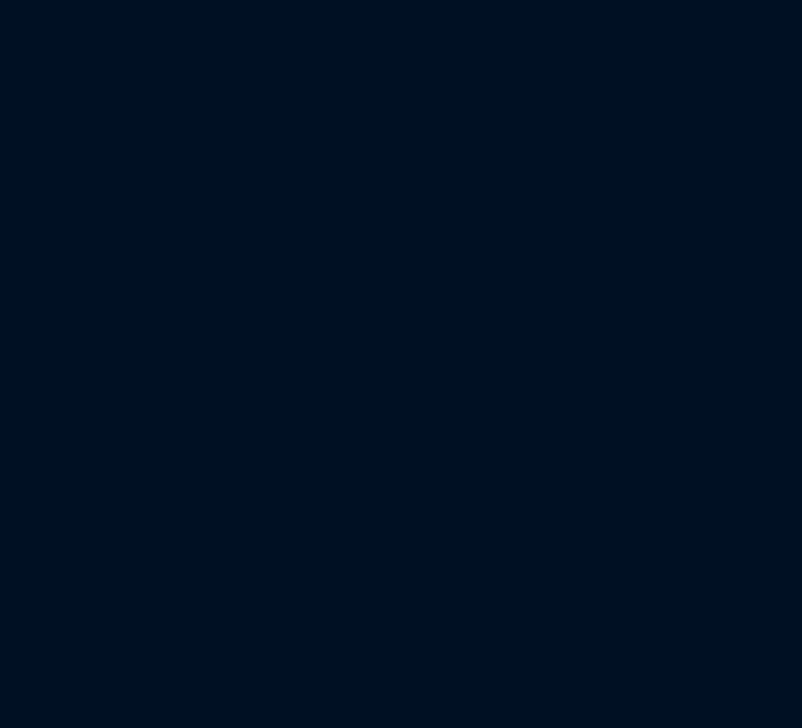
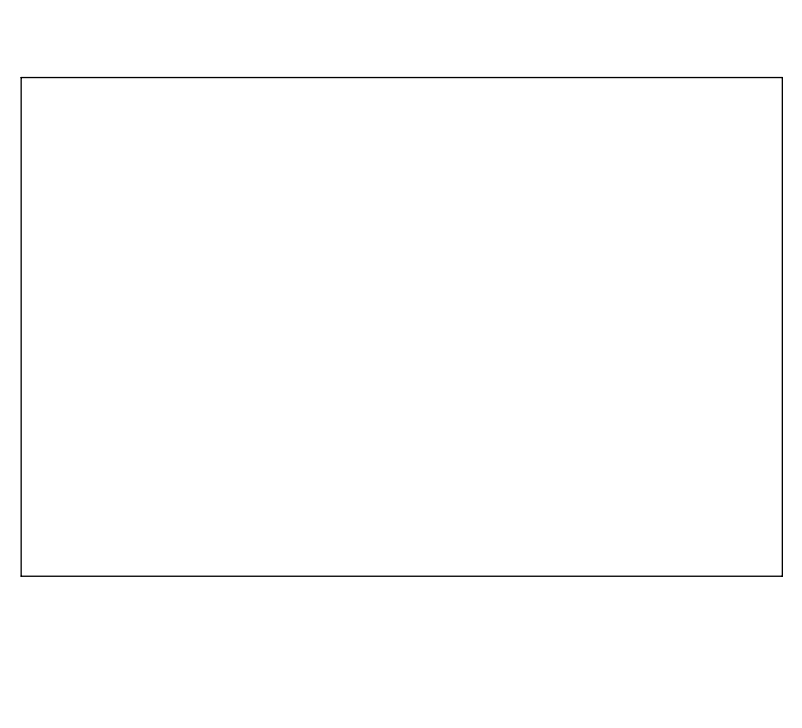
board edge: none -> (782, 77) (21, 77) (21, 576) (782, 576) (782, 77)

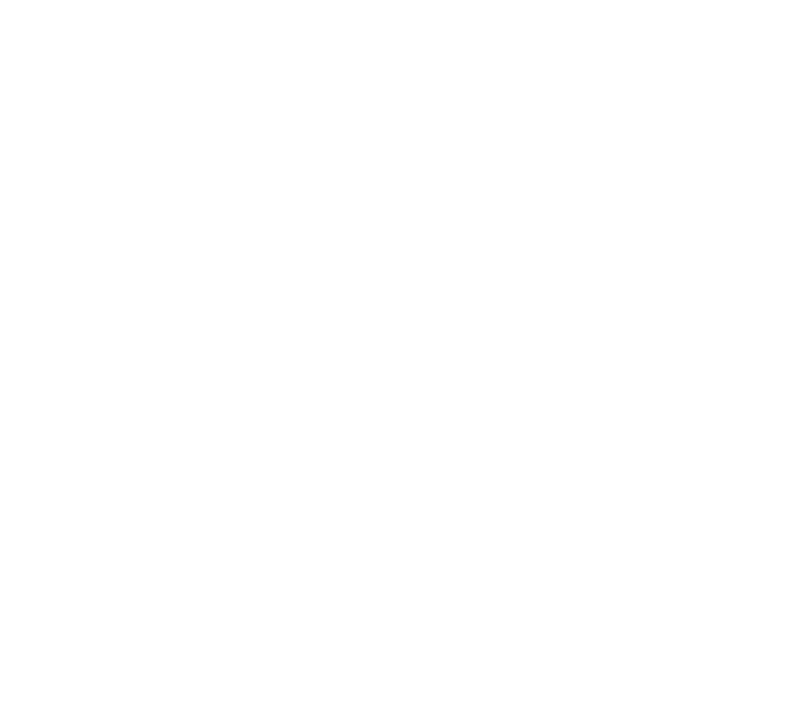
board edge: (782, 77) (21, 77) (21, 576) (782, 576) (782, 77) -> none

